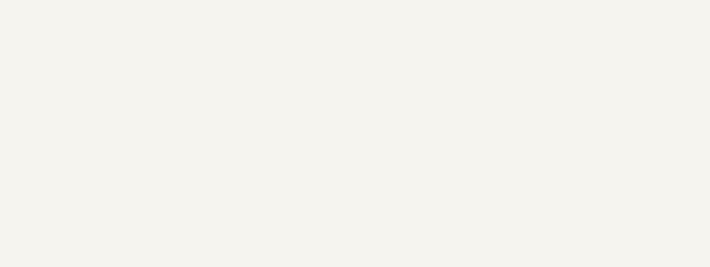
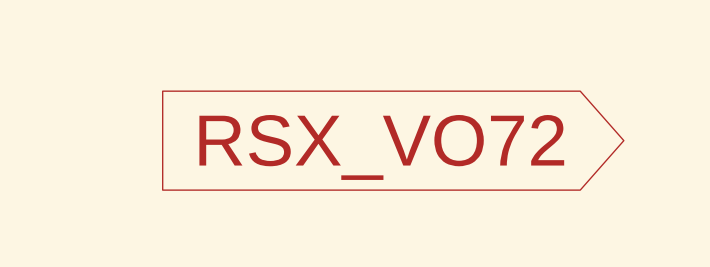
global label: none -> RSX_VO72 (381, 147)

